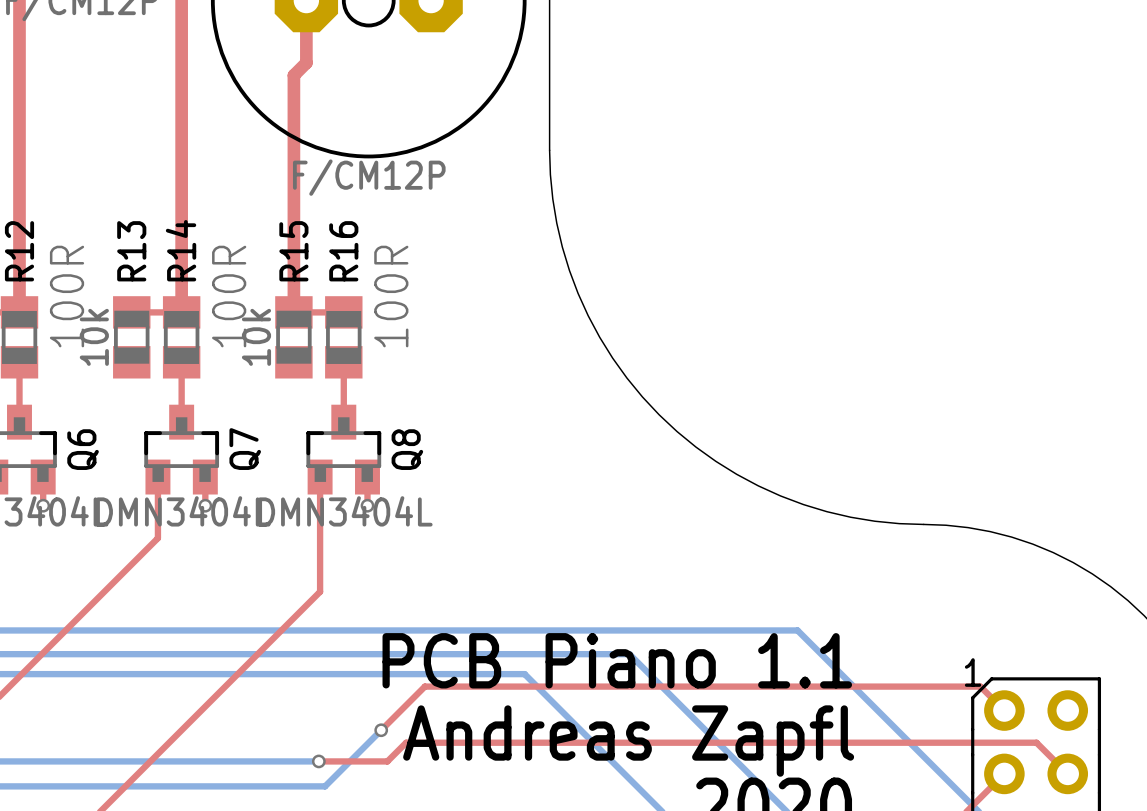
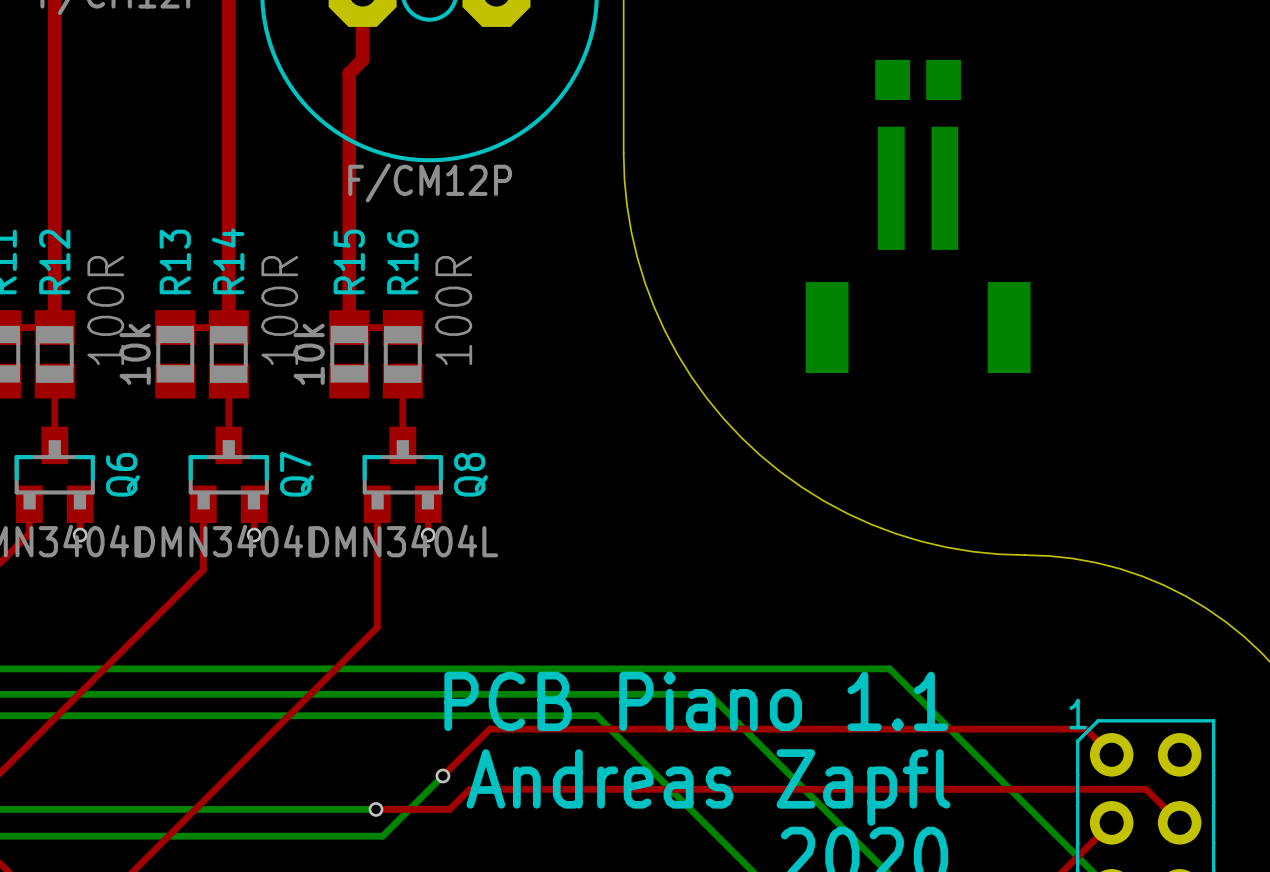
part: none -> (918, 79)
part: none -> (918, 249)

